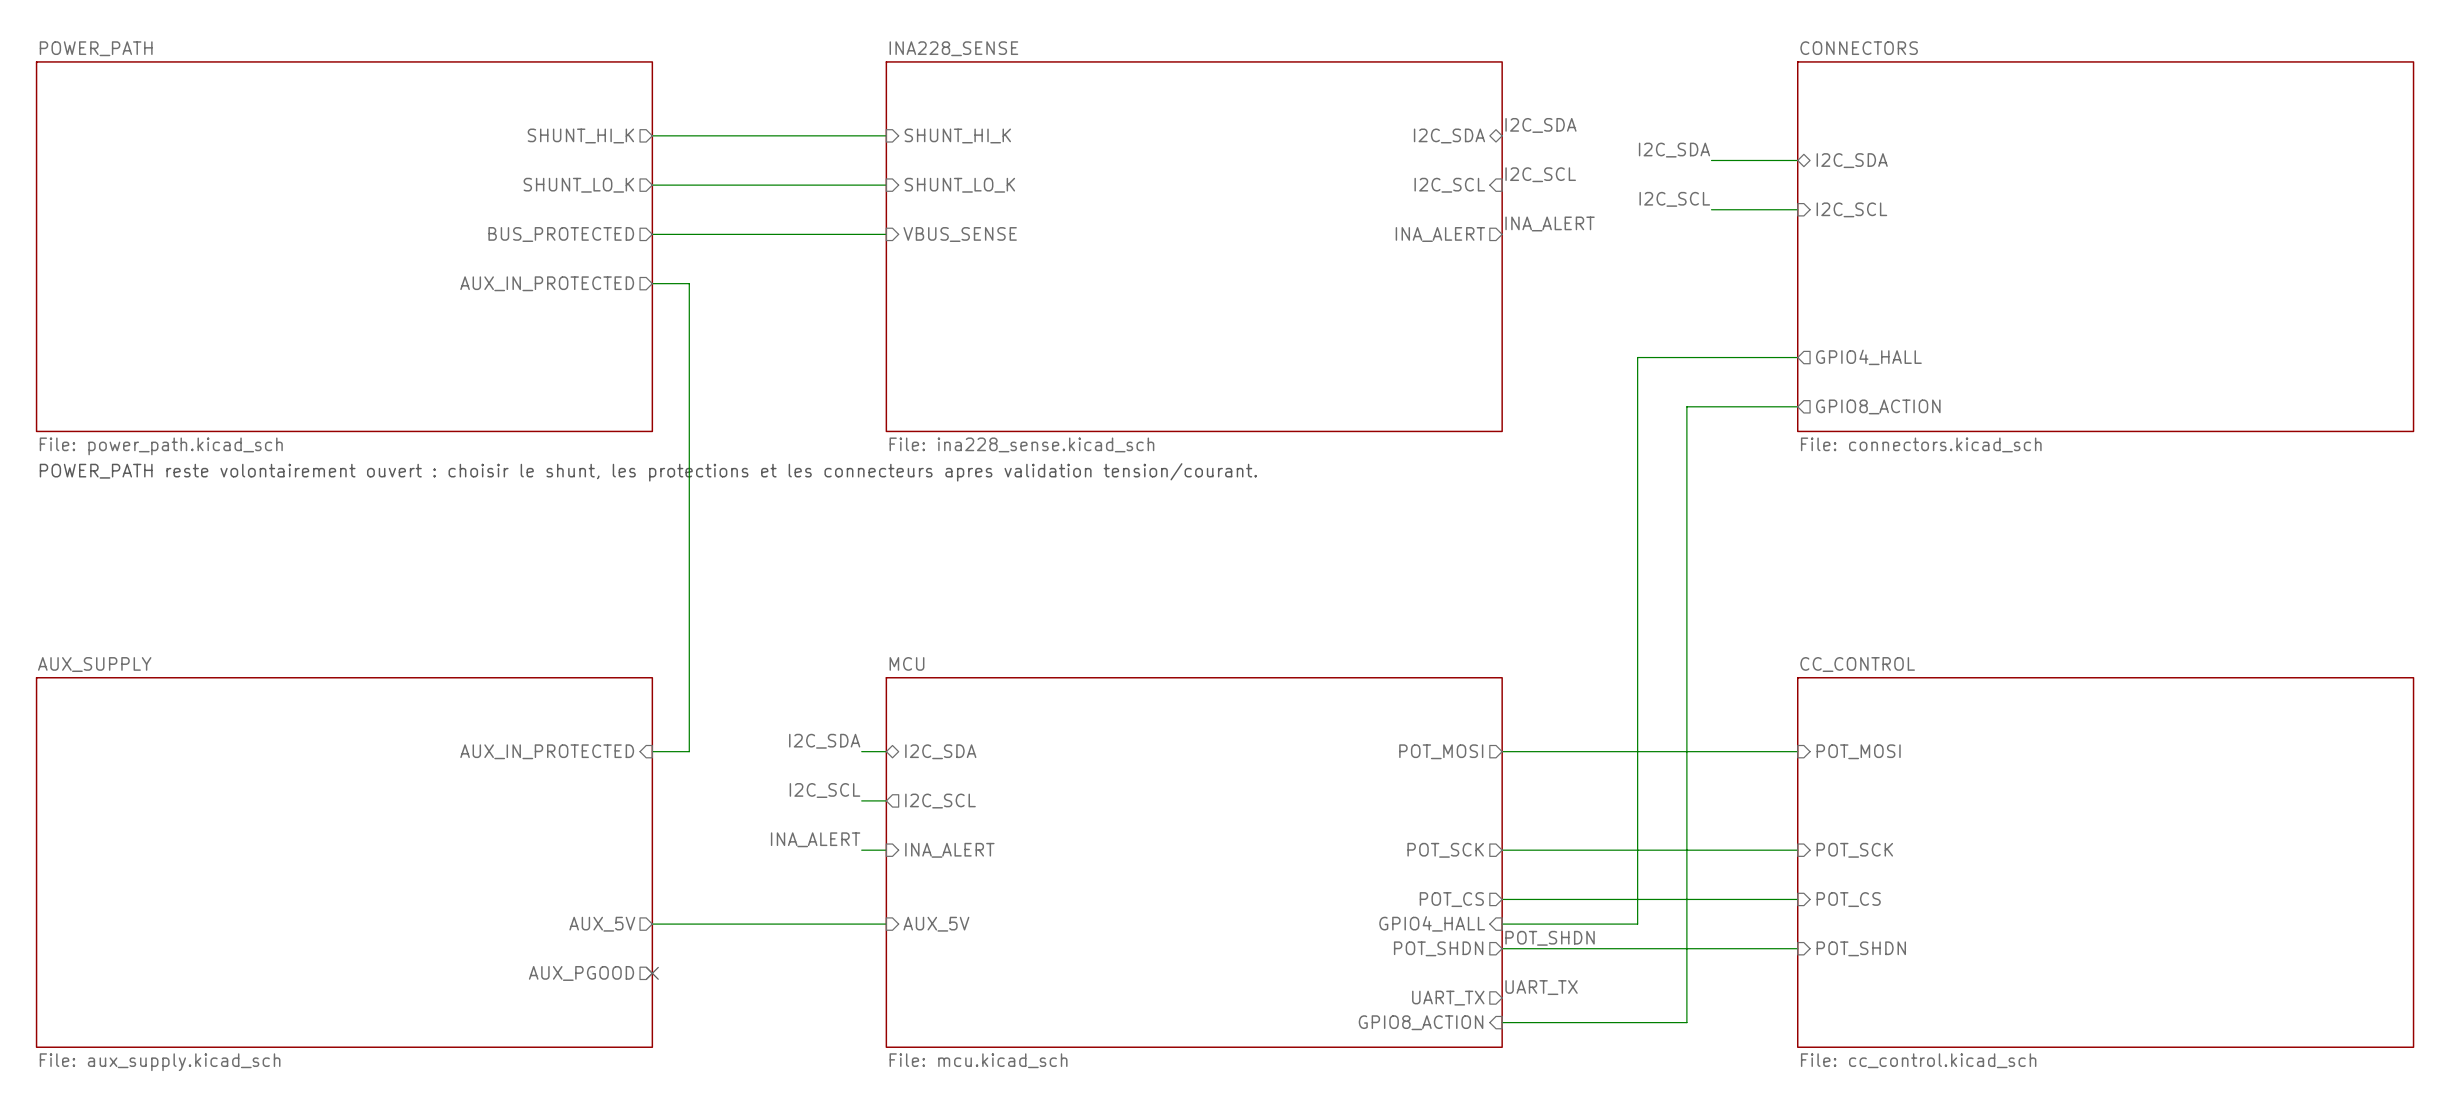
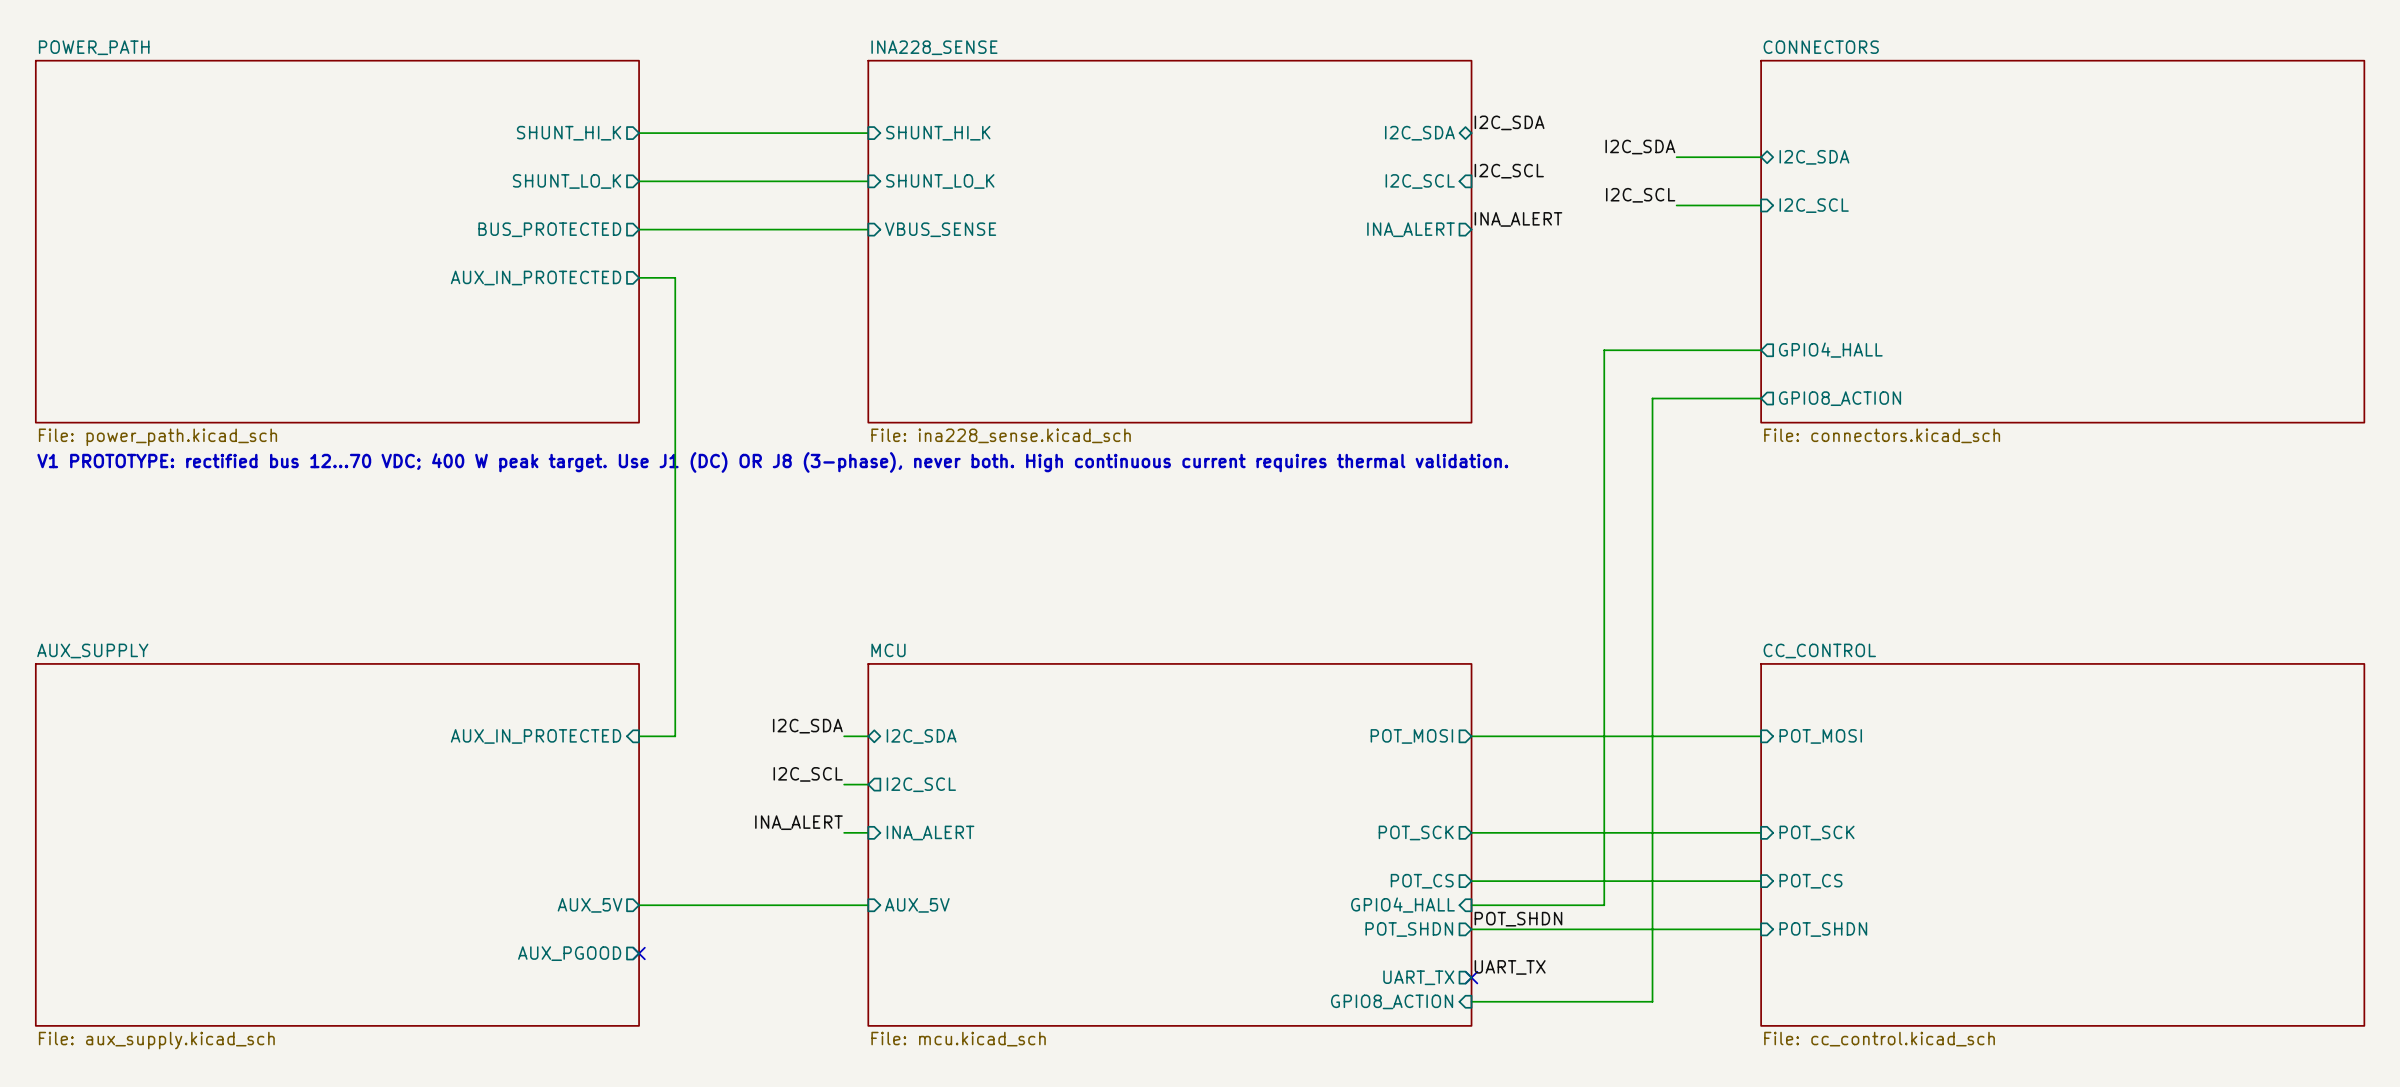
text: POWER_PATH reste volontairement ouvert : choisir le shunt, les protections et les connecteurs apres validation tension/courant. (648, 472) -> V1 PROTOTYPE: rectified bus 12...70 VDC; 400 W peak target. Use J1 (DC) OR J8 (3-phase), never both. High continuous current requires thermal validation. (772, 462)
no-connect mark: none -> (1471, 977)

